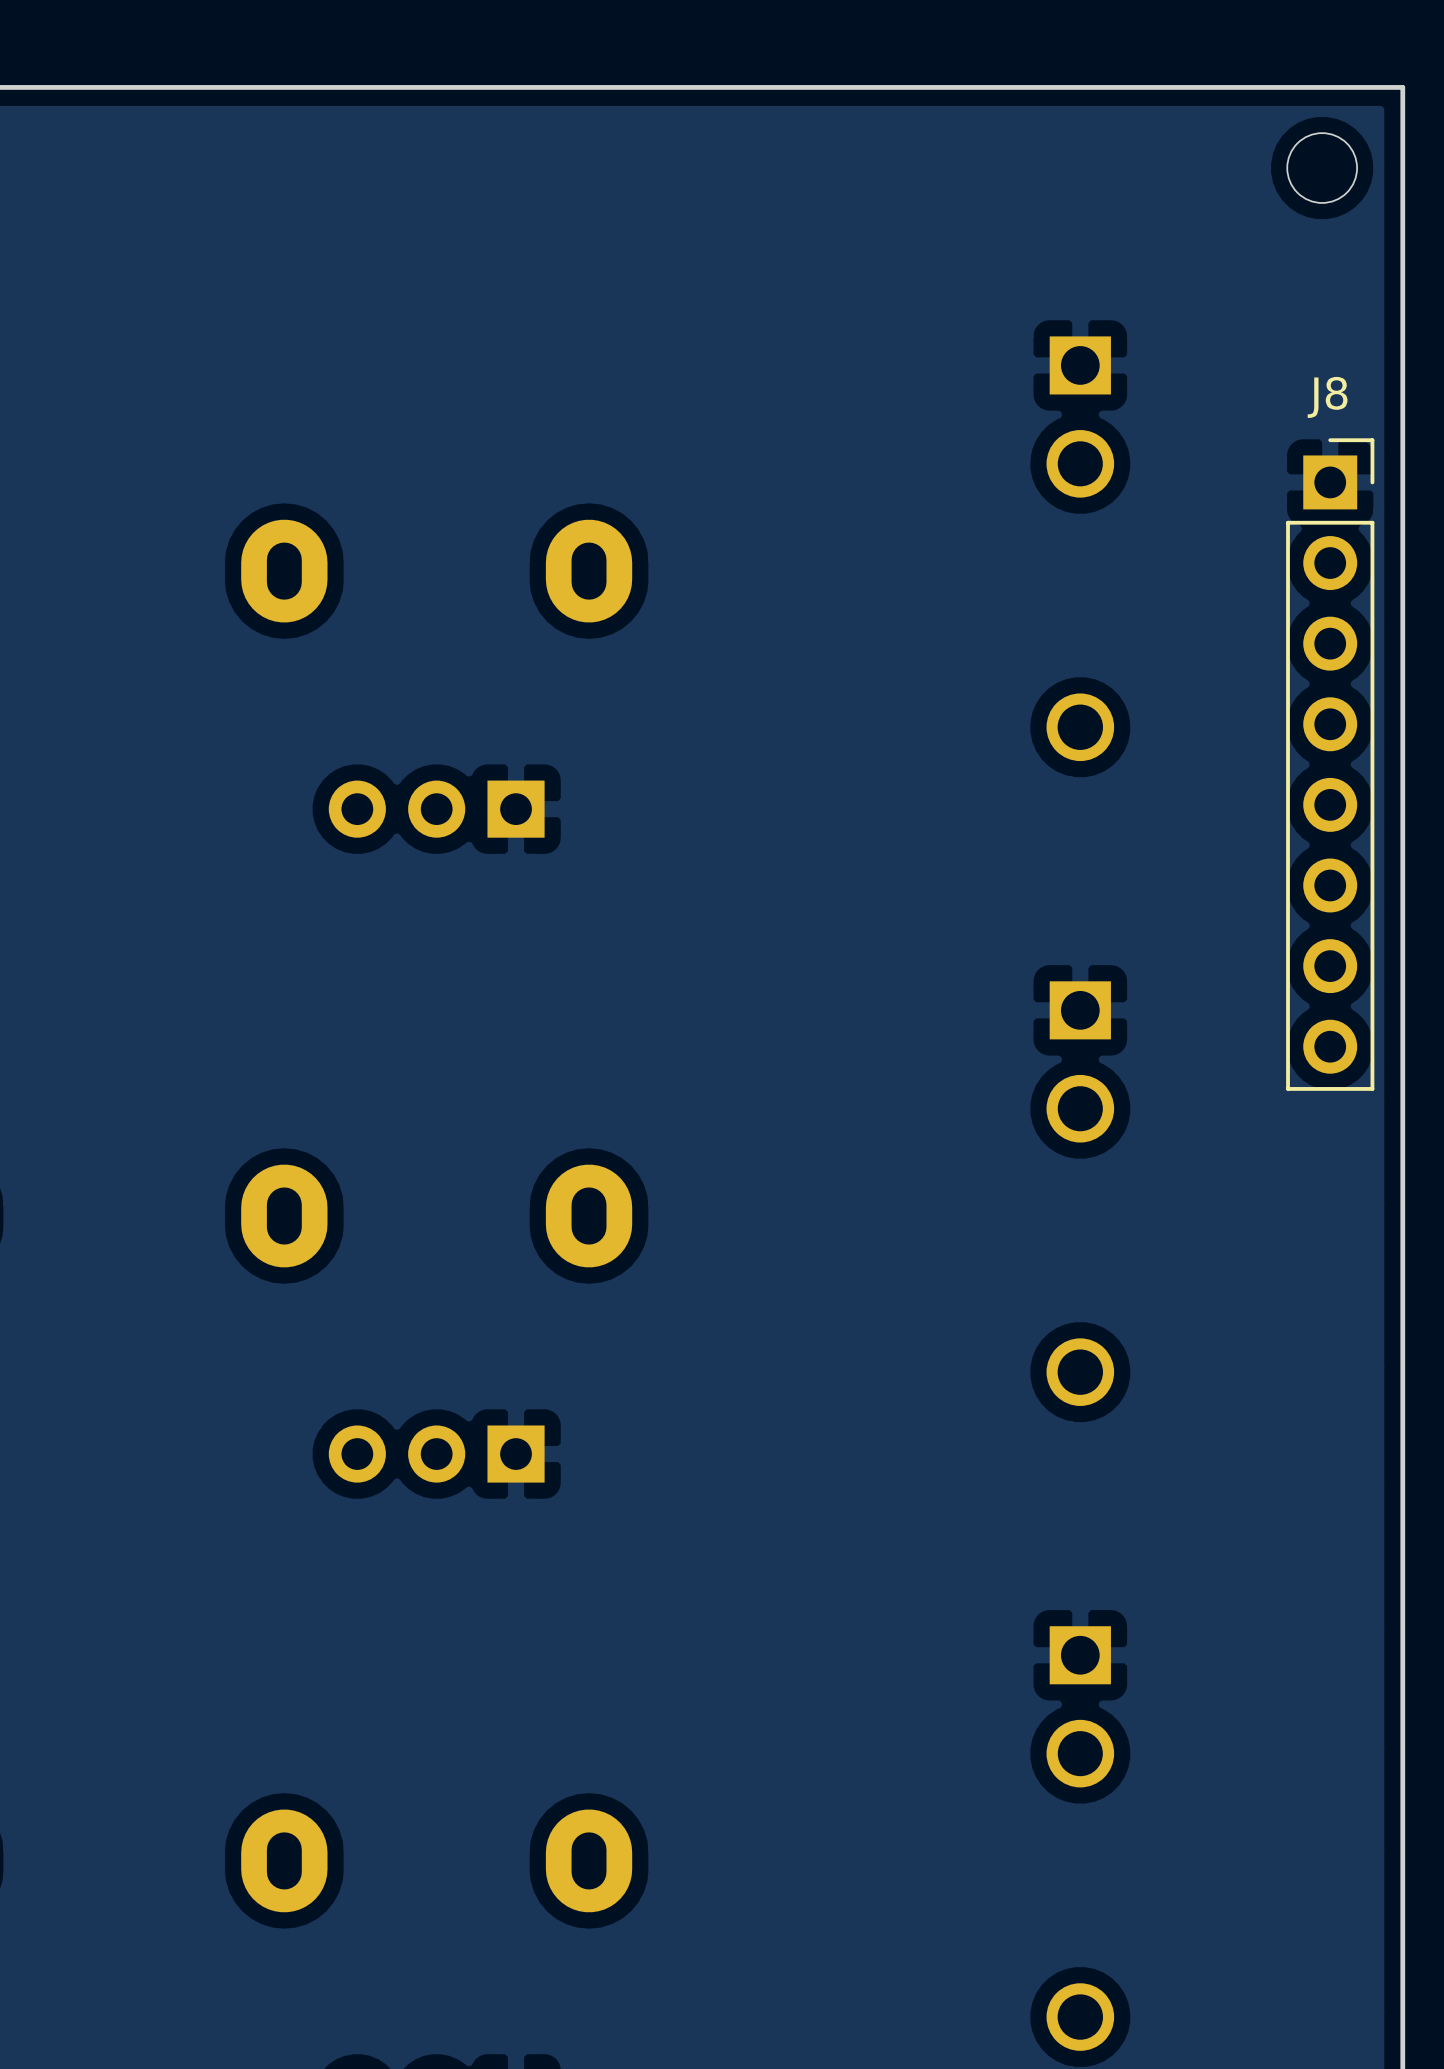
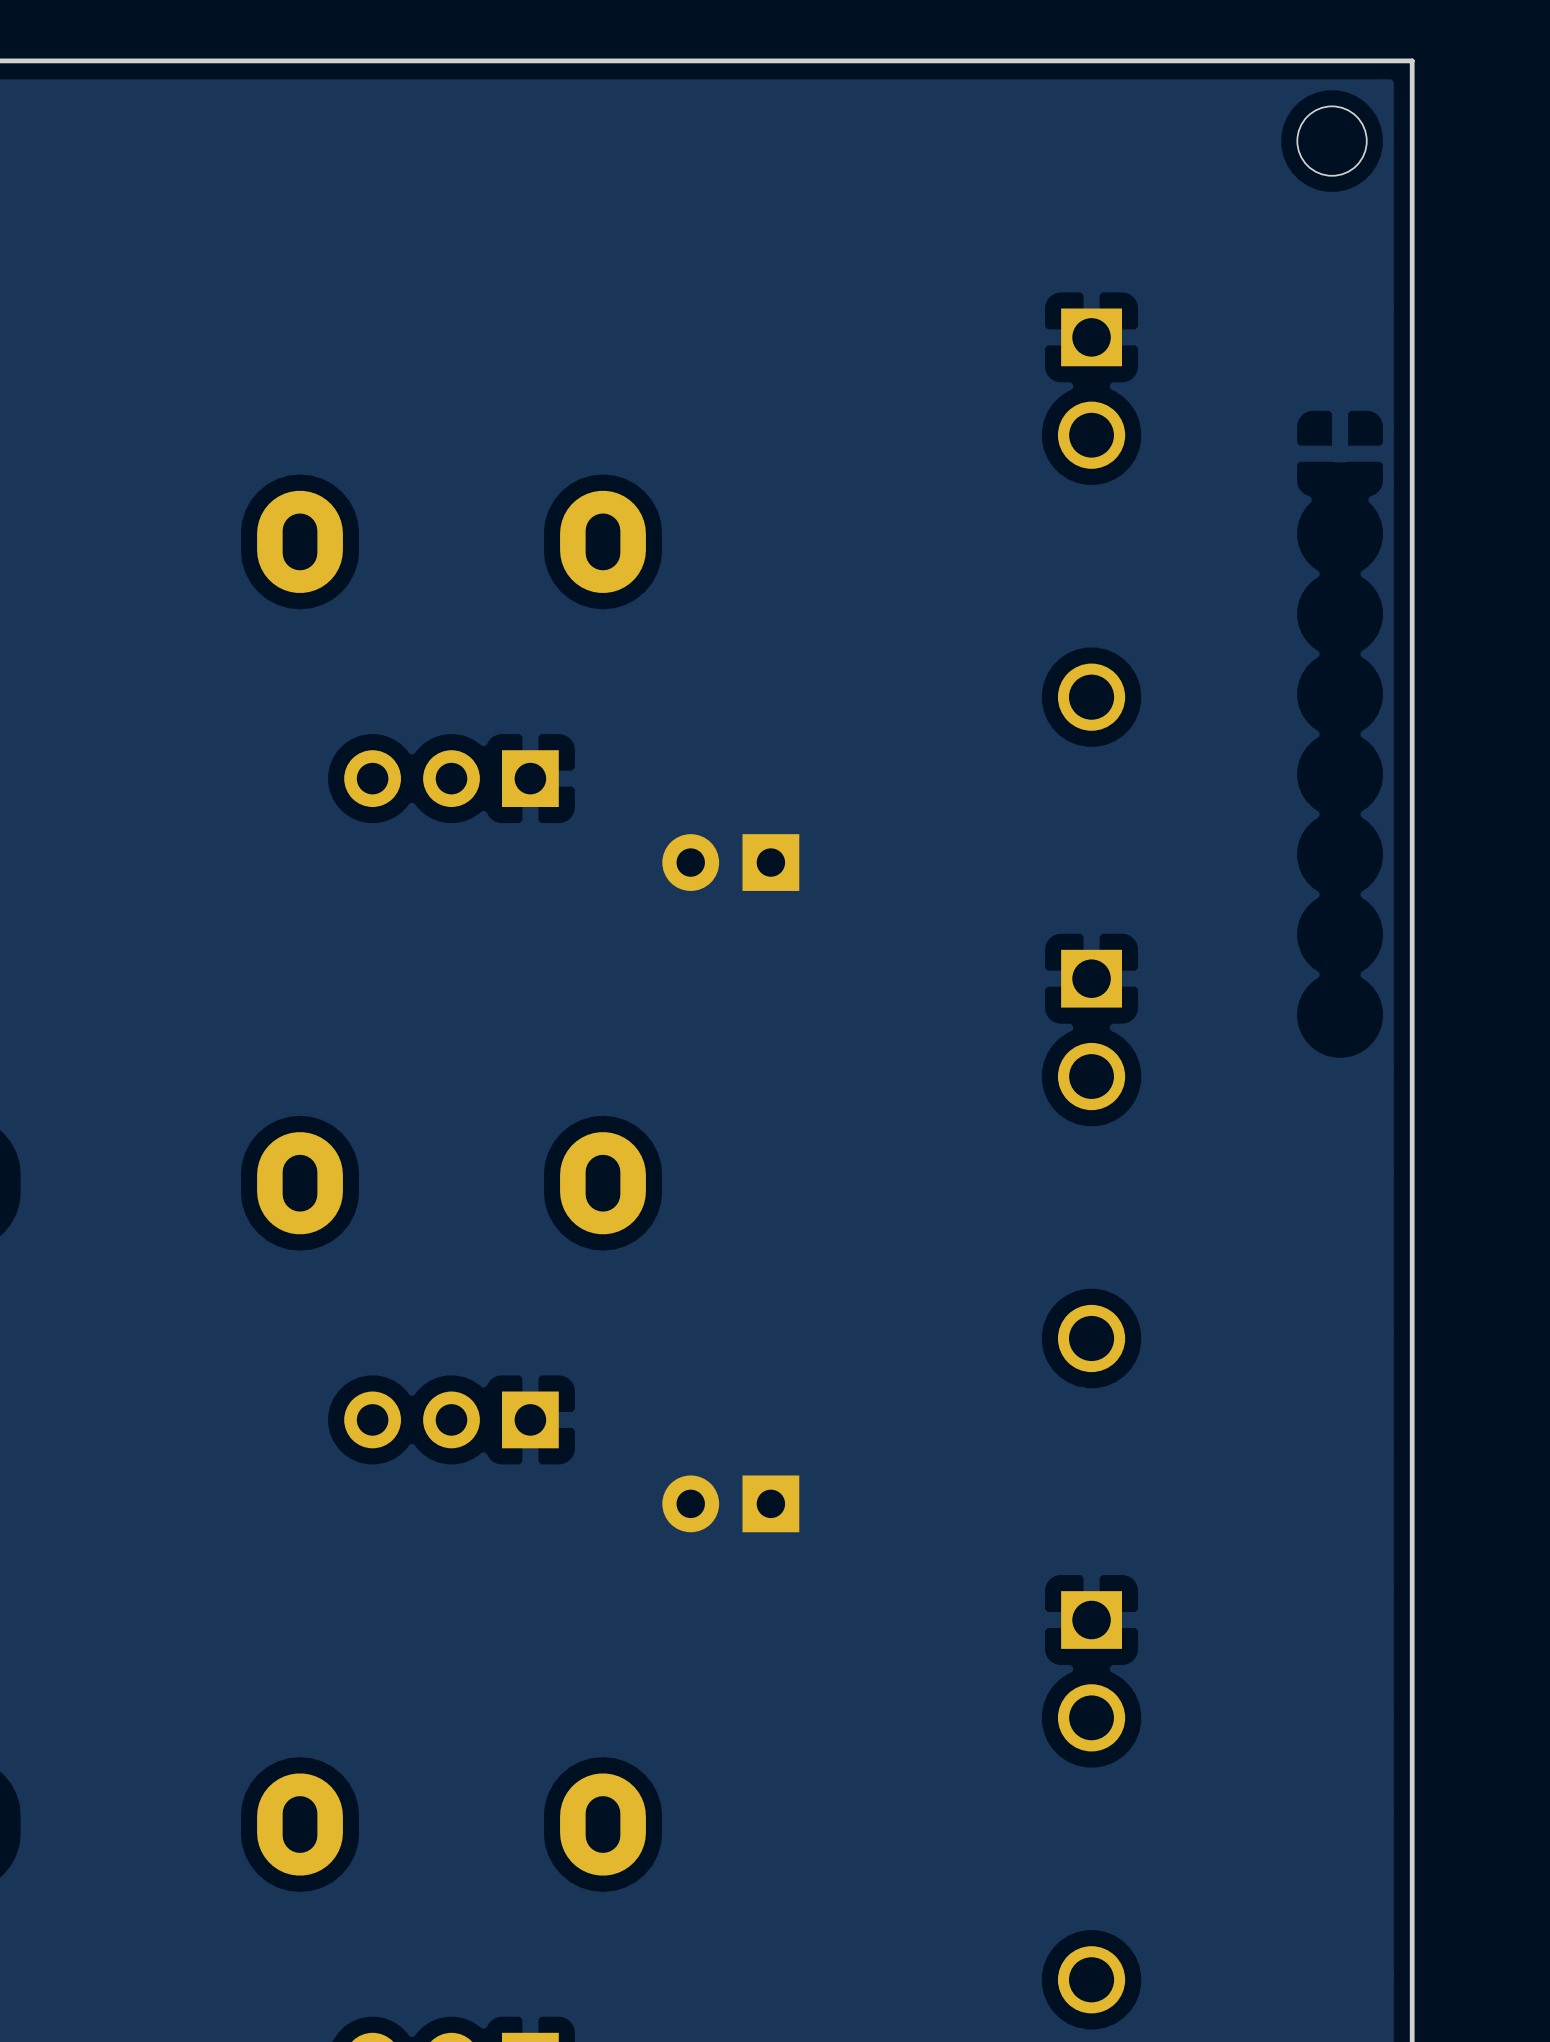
J8: (1330, 764) -> none
part: none -> (730, 862)
part: none -> (730, 1503)

